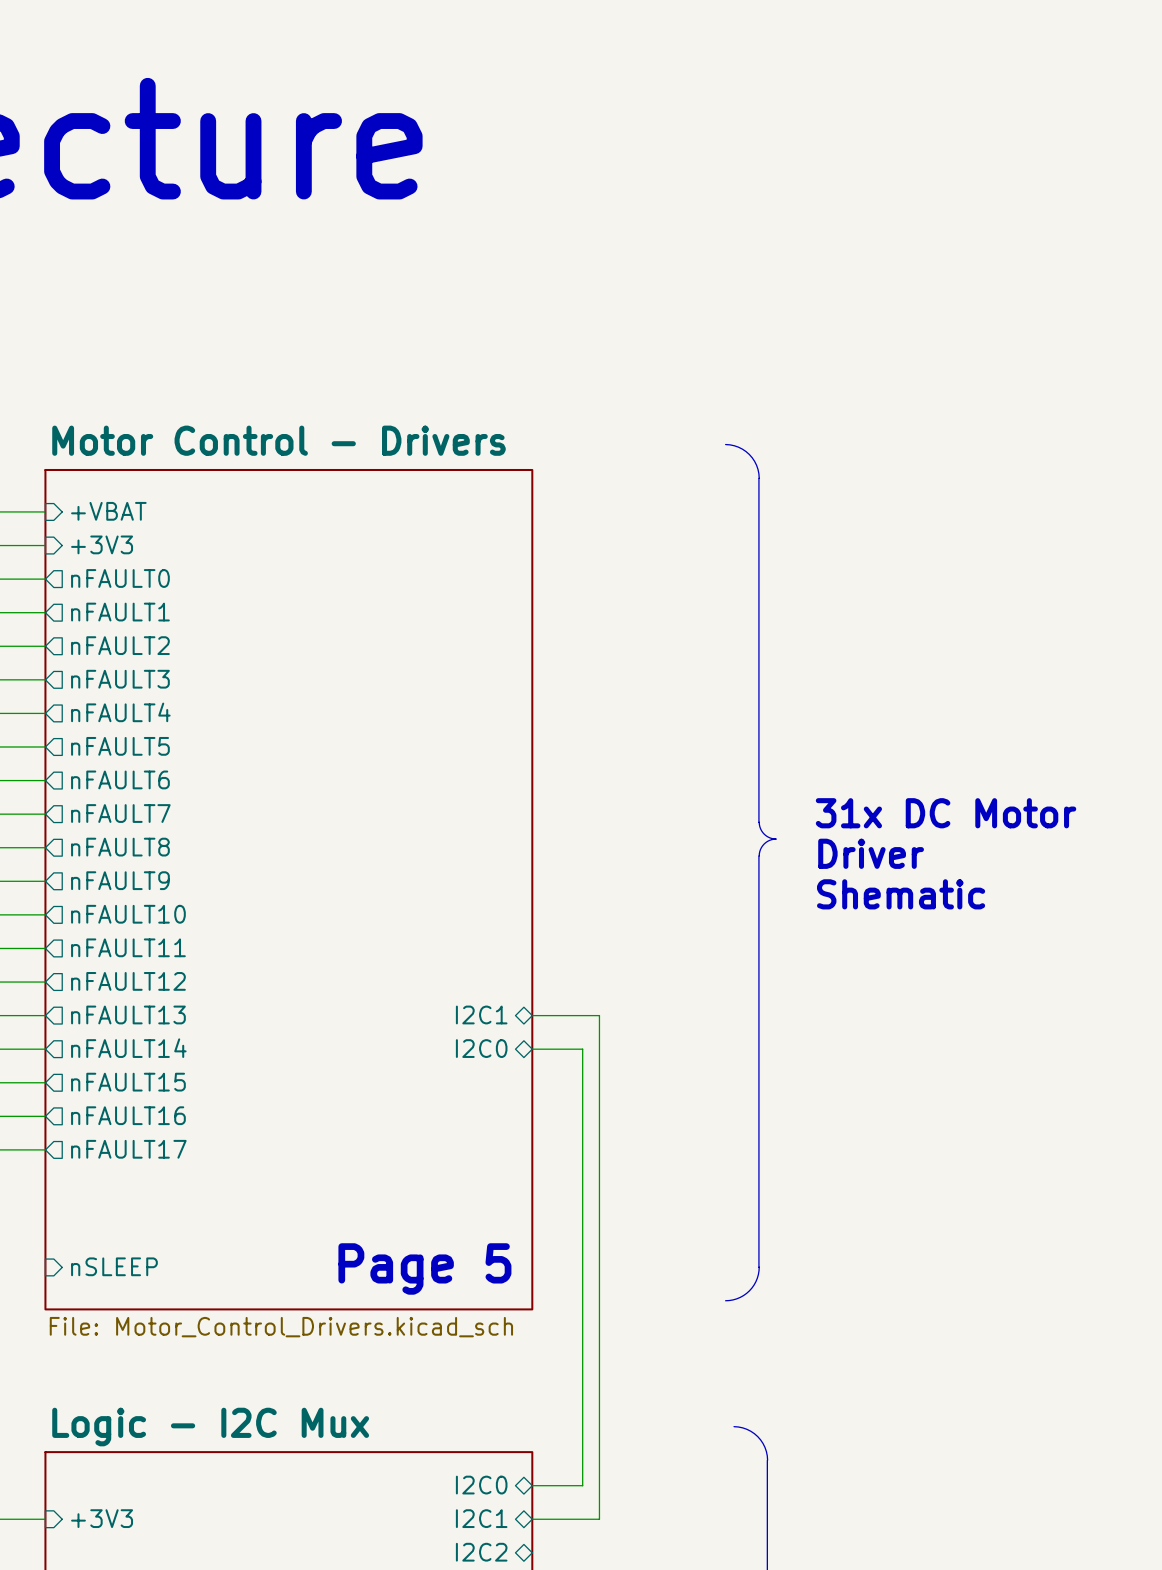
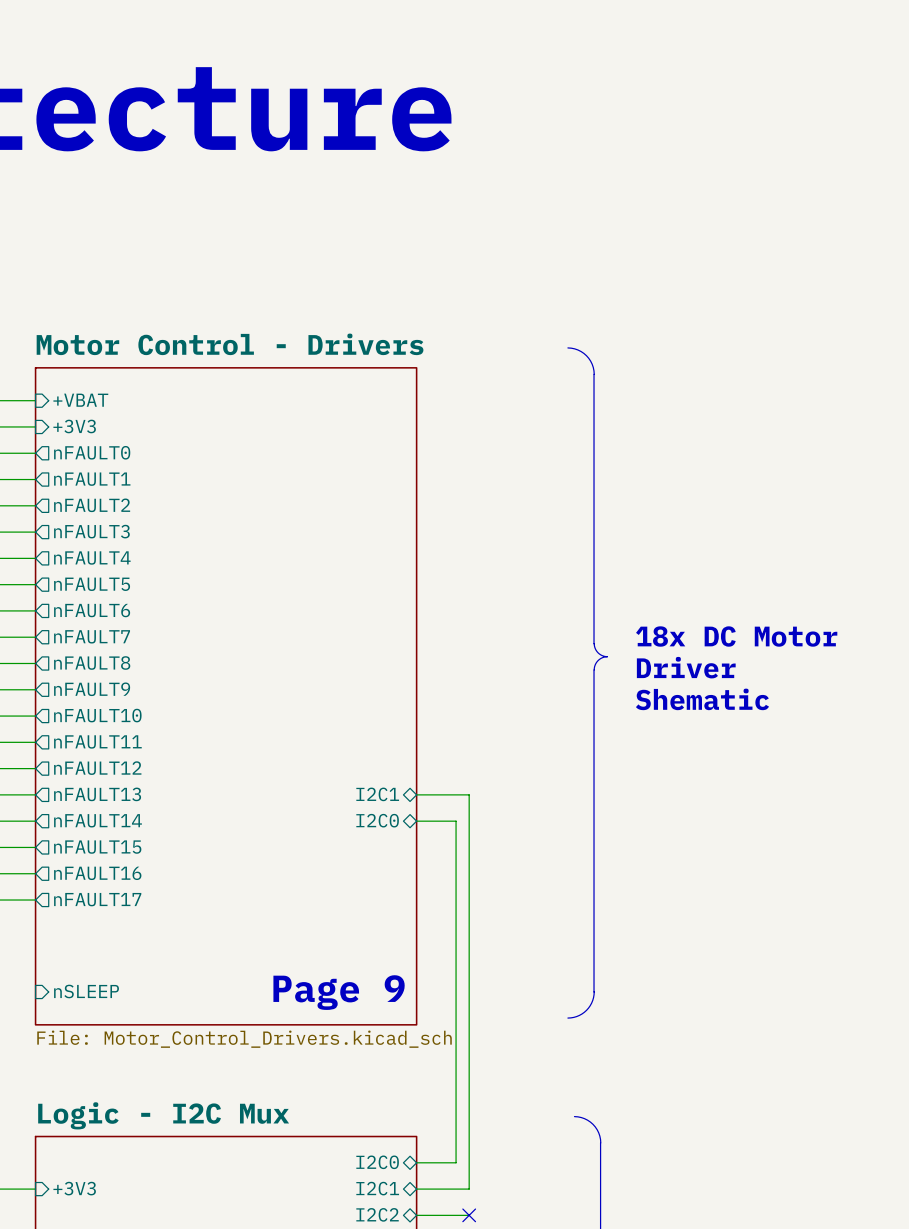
text: 31x DC Motor (946, 813) -> 18x DC Motor (736, 636)
text: Page 5 (424, 1268) -> Page 9 (339, 992)
wire: none -> (416, 1215) (469, 1215)
no-connect mark: none -> (469, 1215)

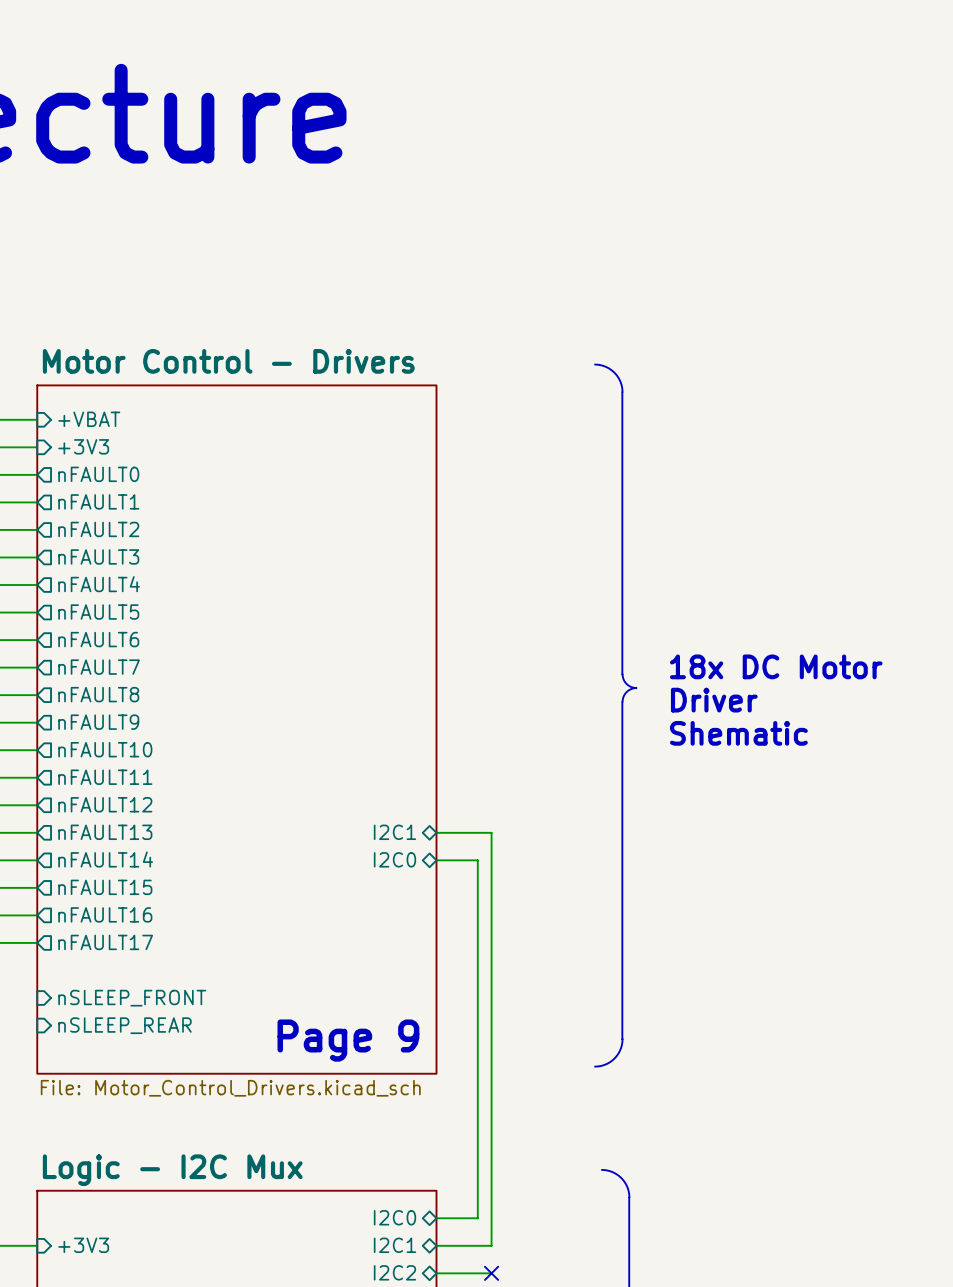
sheet pin: none -> nSLEEP_FRONT (132, 998)
sheet pin: nSLEEP (86, 991) -> nSLEEP_REAR (124, 1025)

